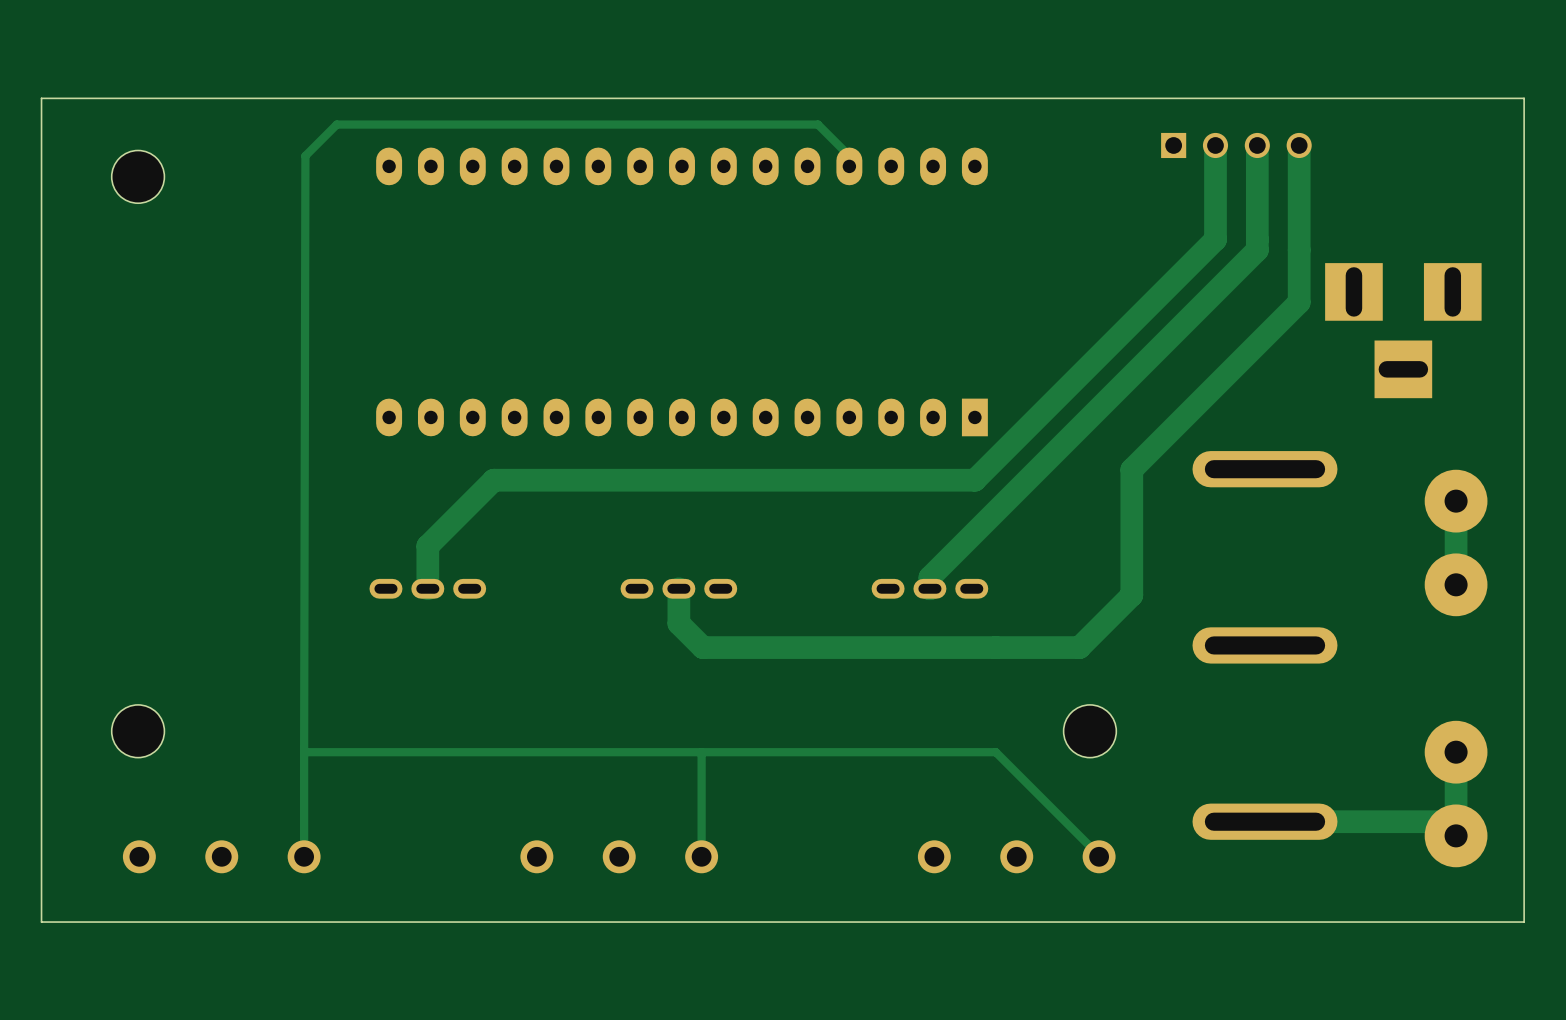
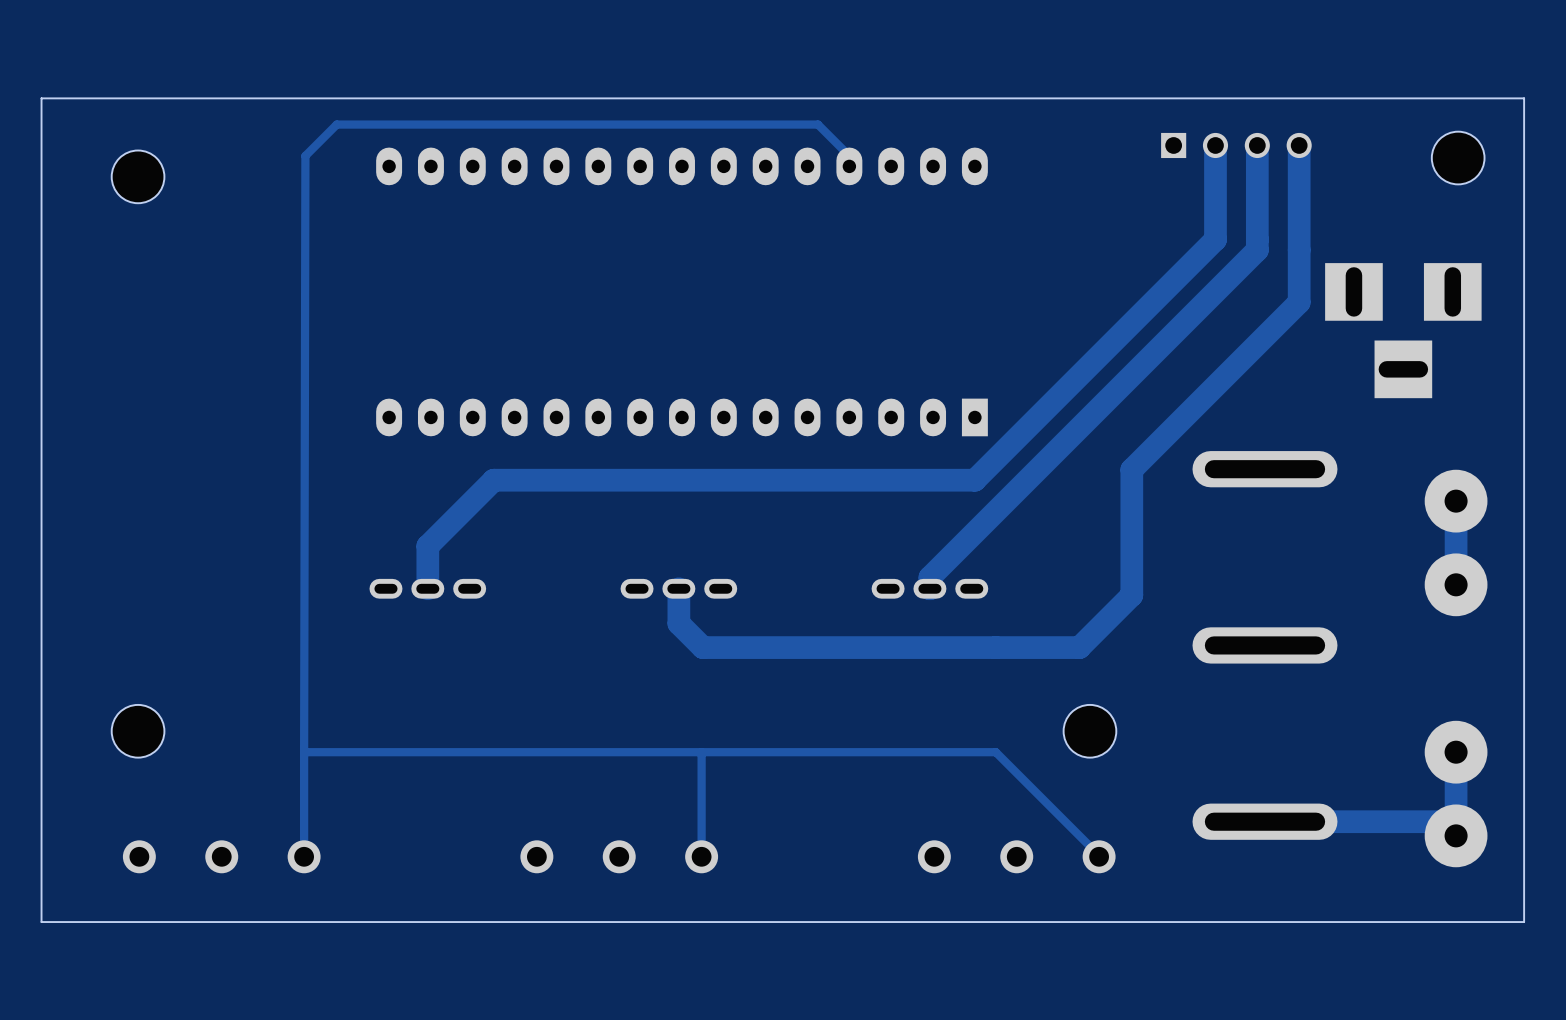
part: none -> (1458, 158)

